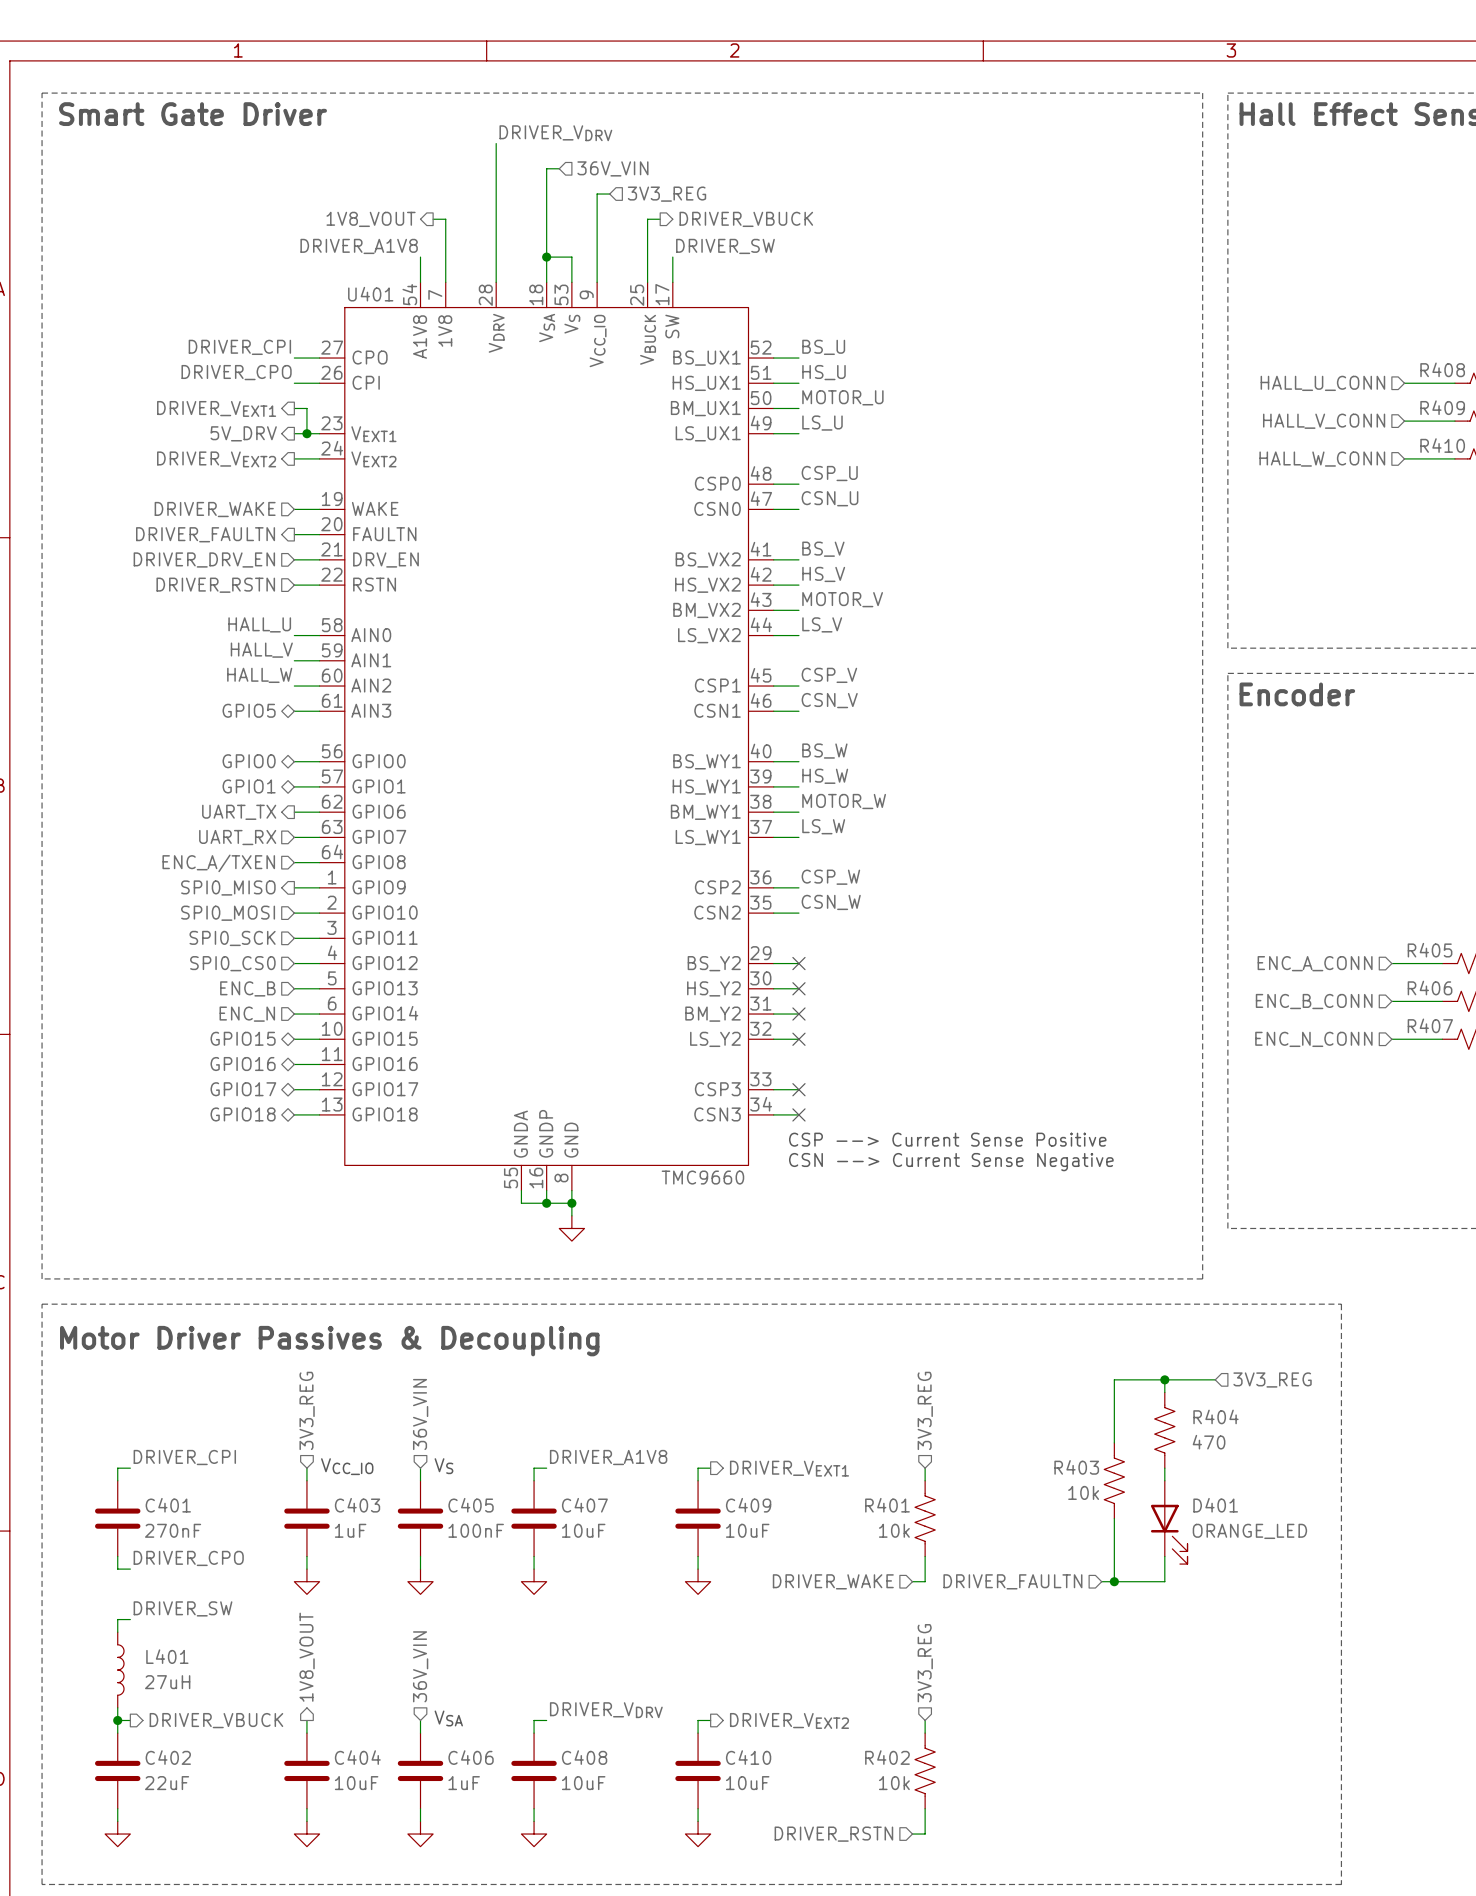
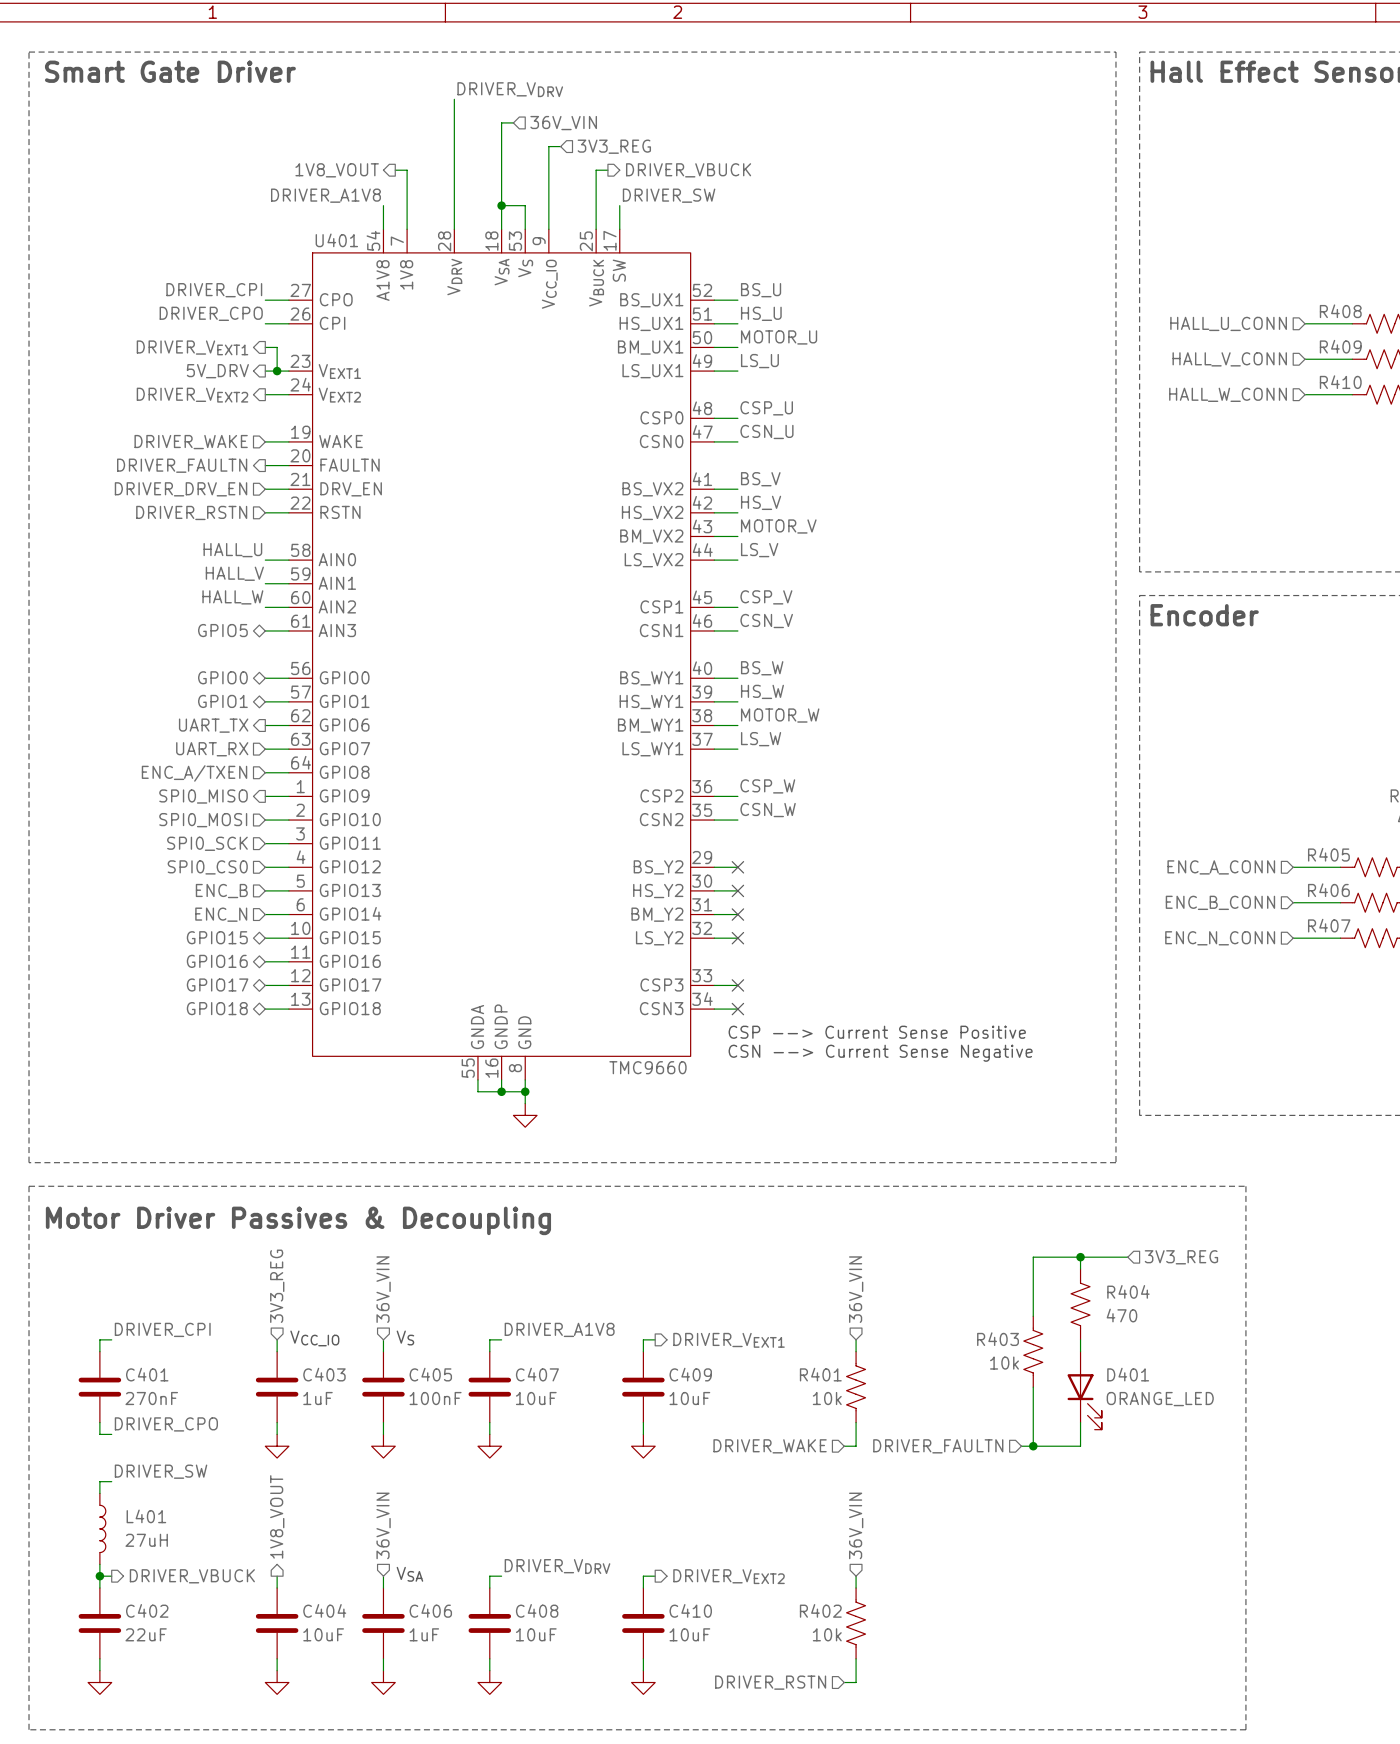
hierarchical label: 3V3_REG (925, 1410) -> 36V_VIN (856, 1289)
hierarchical label: 3V3_REG (925, 1663) -> 36V_VIN (856, 1525)

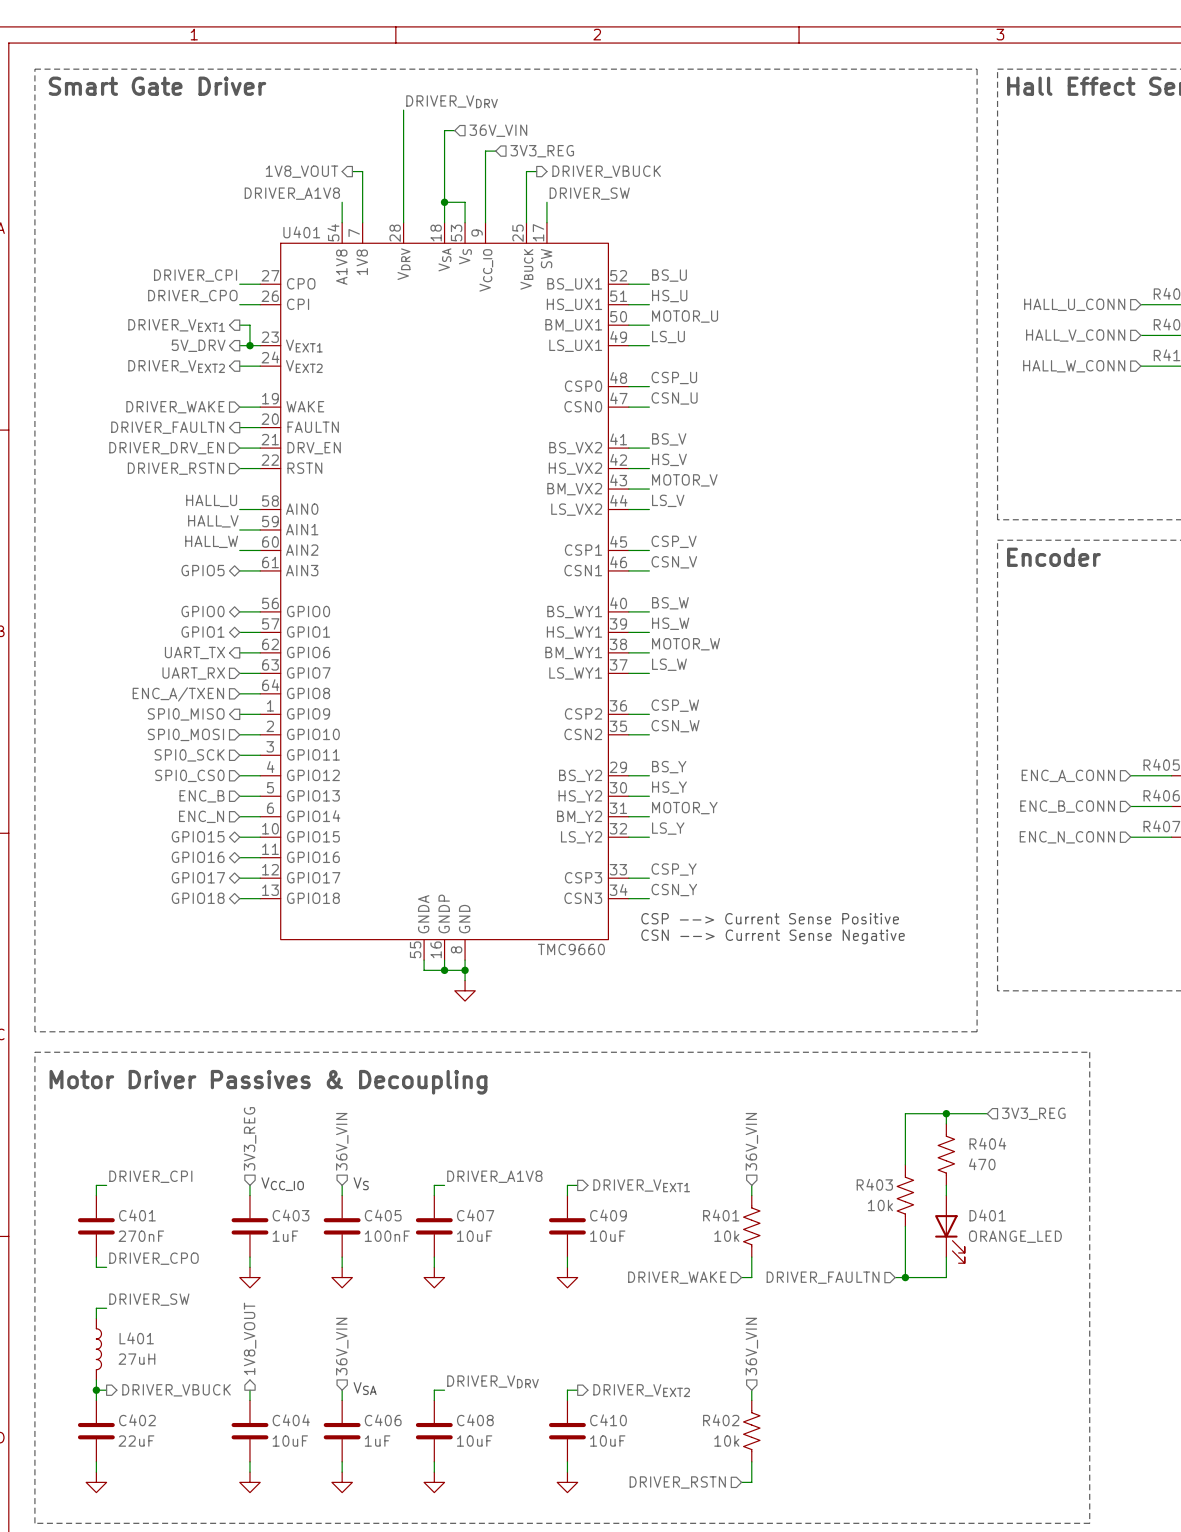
label: none -> BS_Y (669, 767)
no-connect mark: (737, 867) -> none
label: none -> HS_Y (669, 787)
no-connect mark: (737, 890) -> none
label: none -> MOTOR_Y (684, 808)
no-connect mark: (737, 914) -> none
label: none -> LS_Y (668, 828)
no-connect mark: (737, 938) -> none
label: none -> CSP_Y (674, 869)
no-connect mark: (737, 985) -> none
label: none -> CSN_Y (674, 890)
no-connect mark: (737, 1009) -> none

